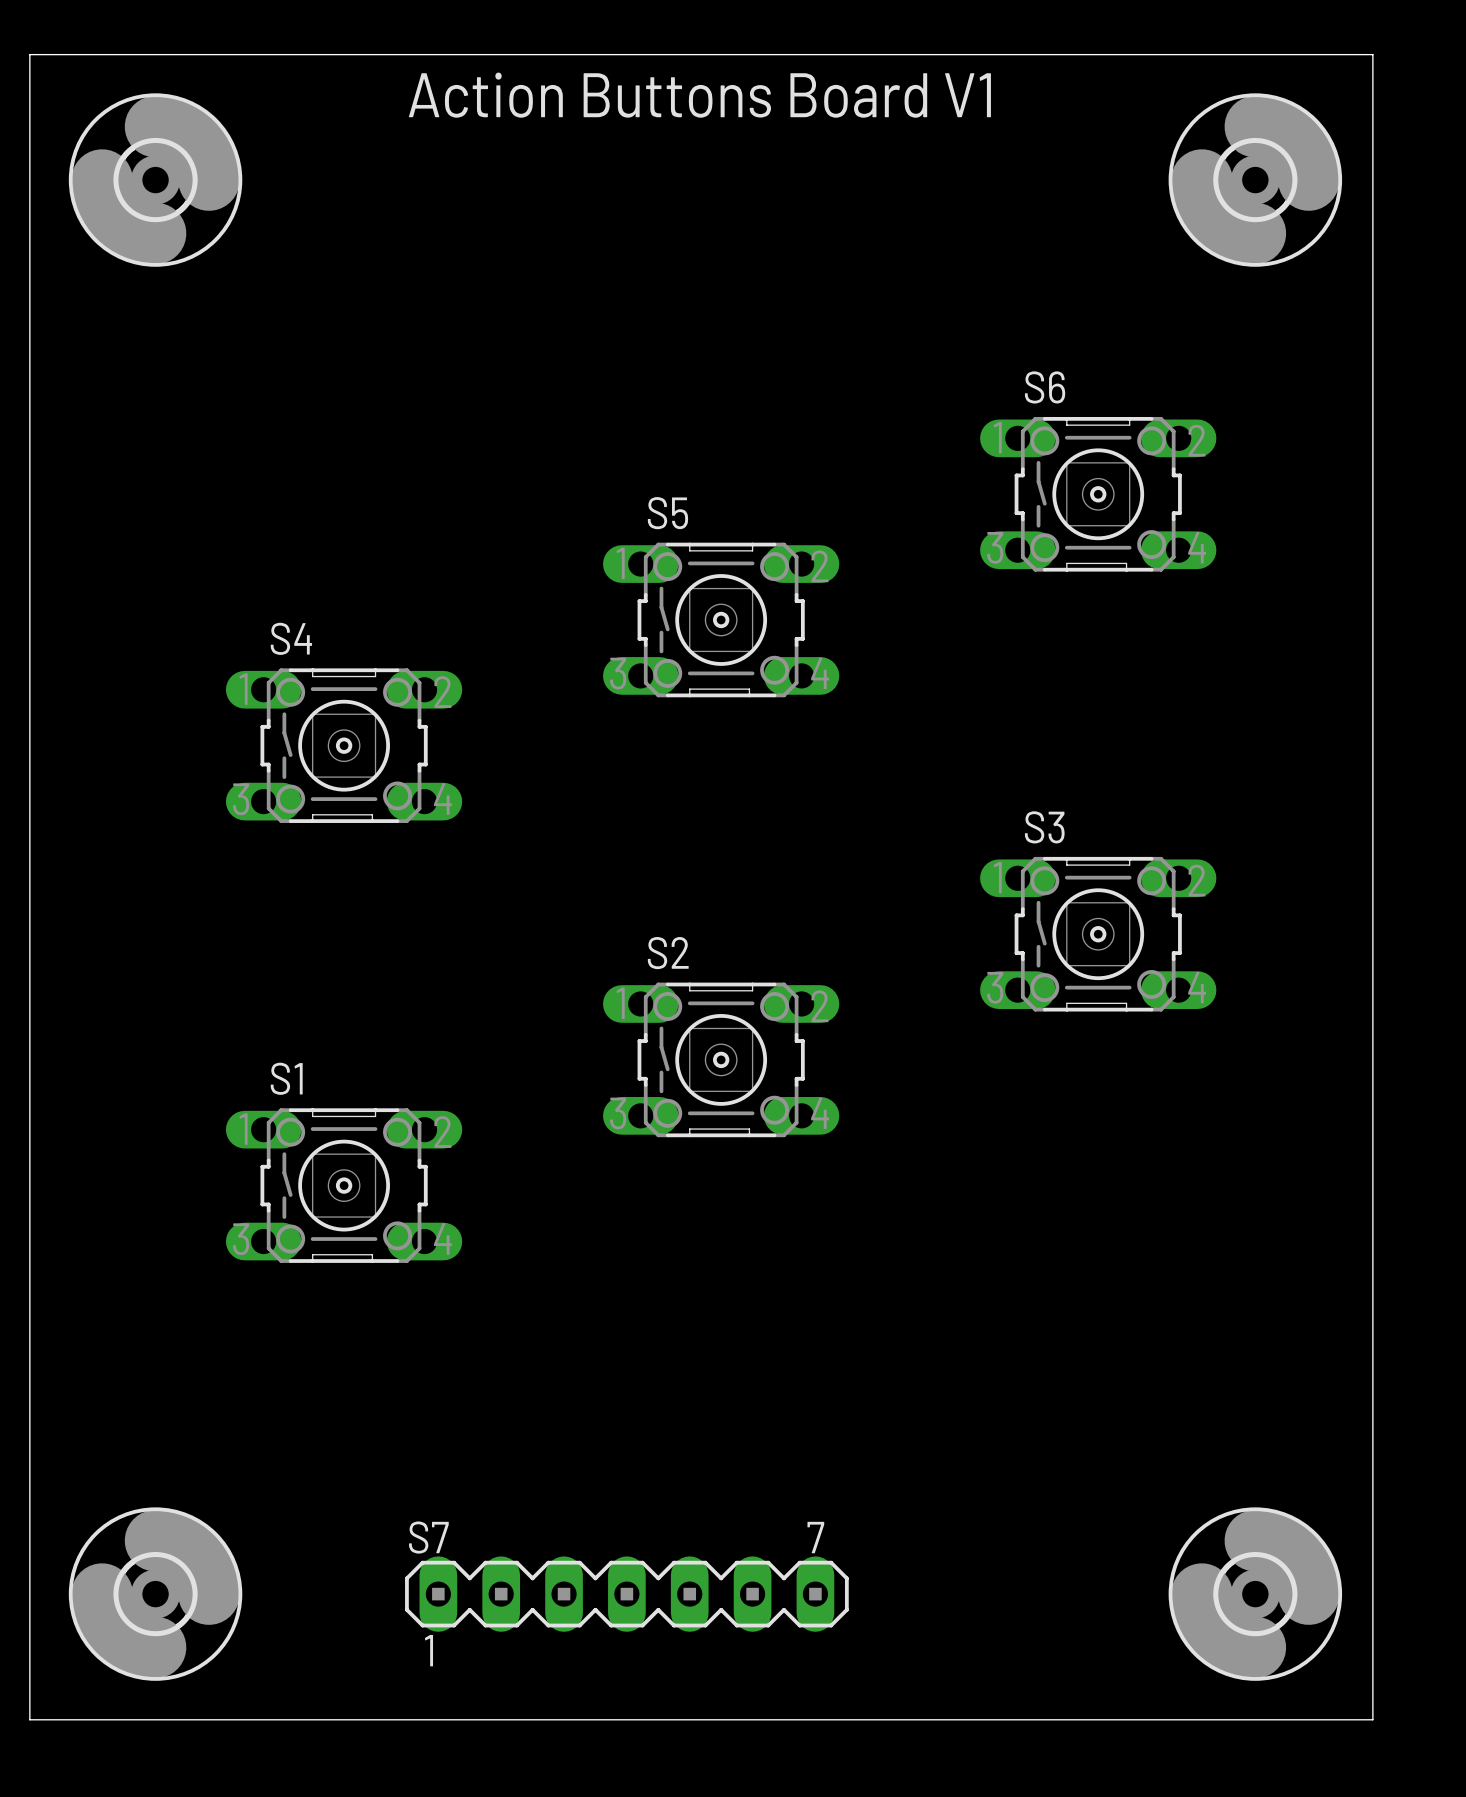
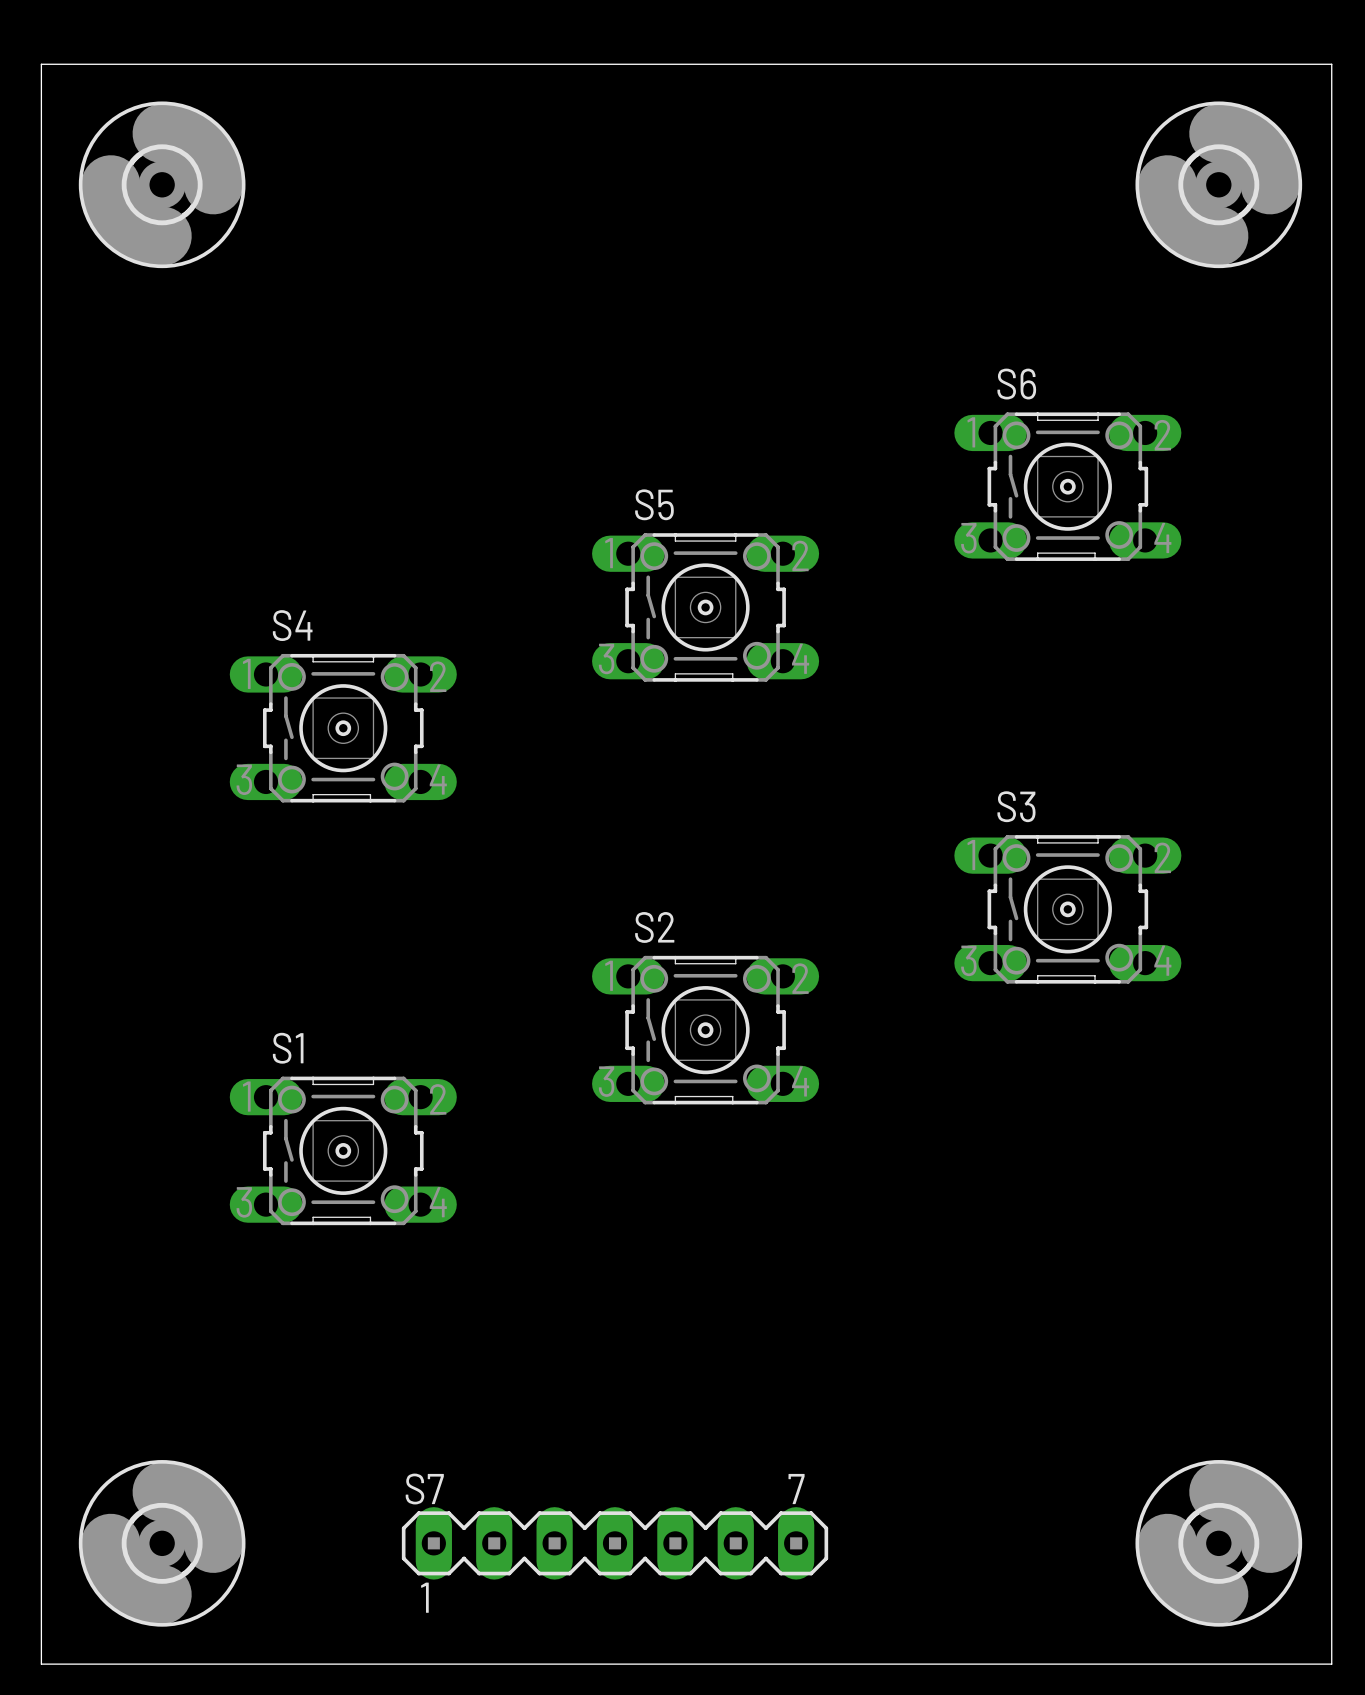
text: Action Buttons Board V1 (699, 95) -> none

